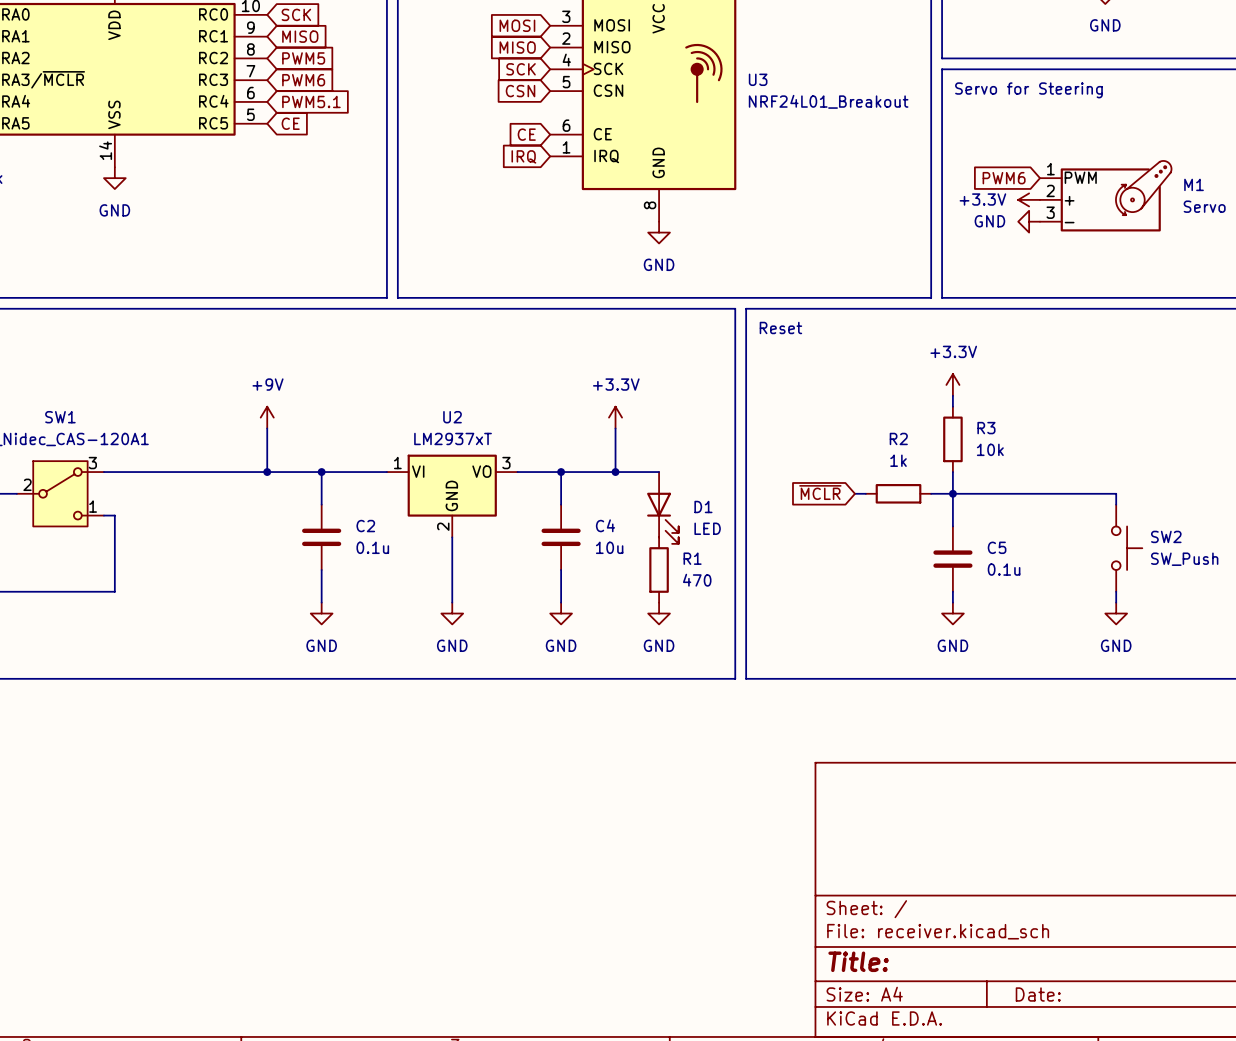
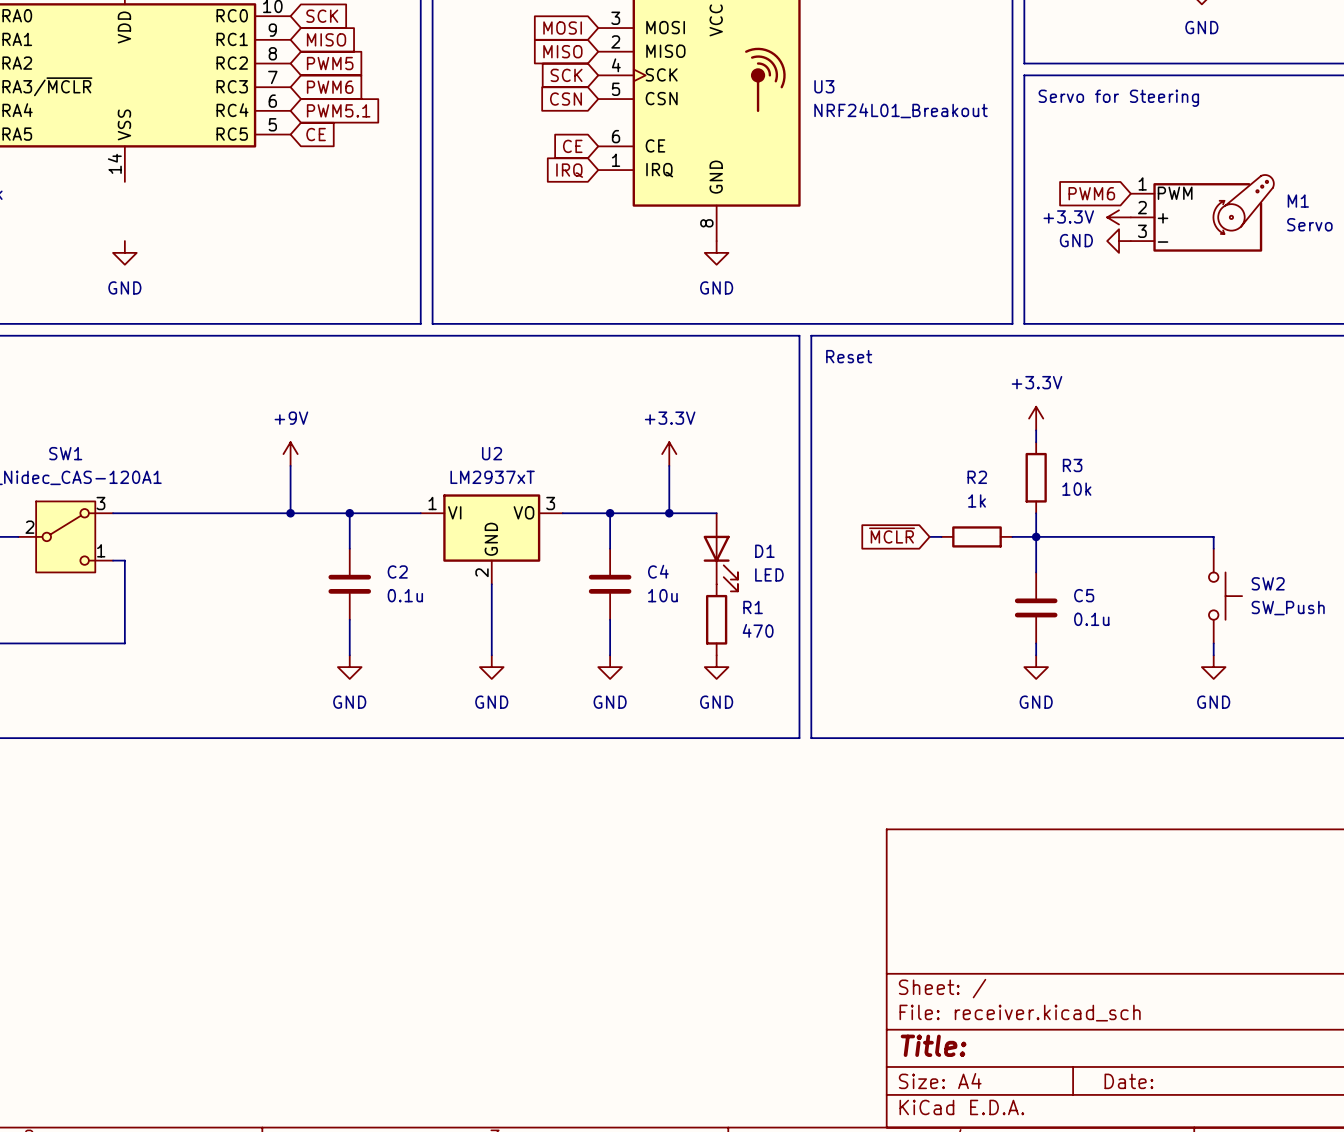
power symbol position: GND (114, 178) -> GND (124, 252)

